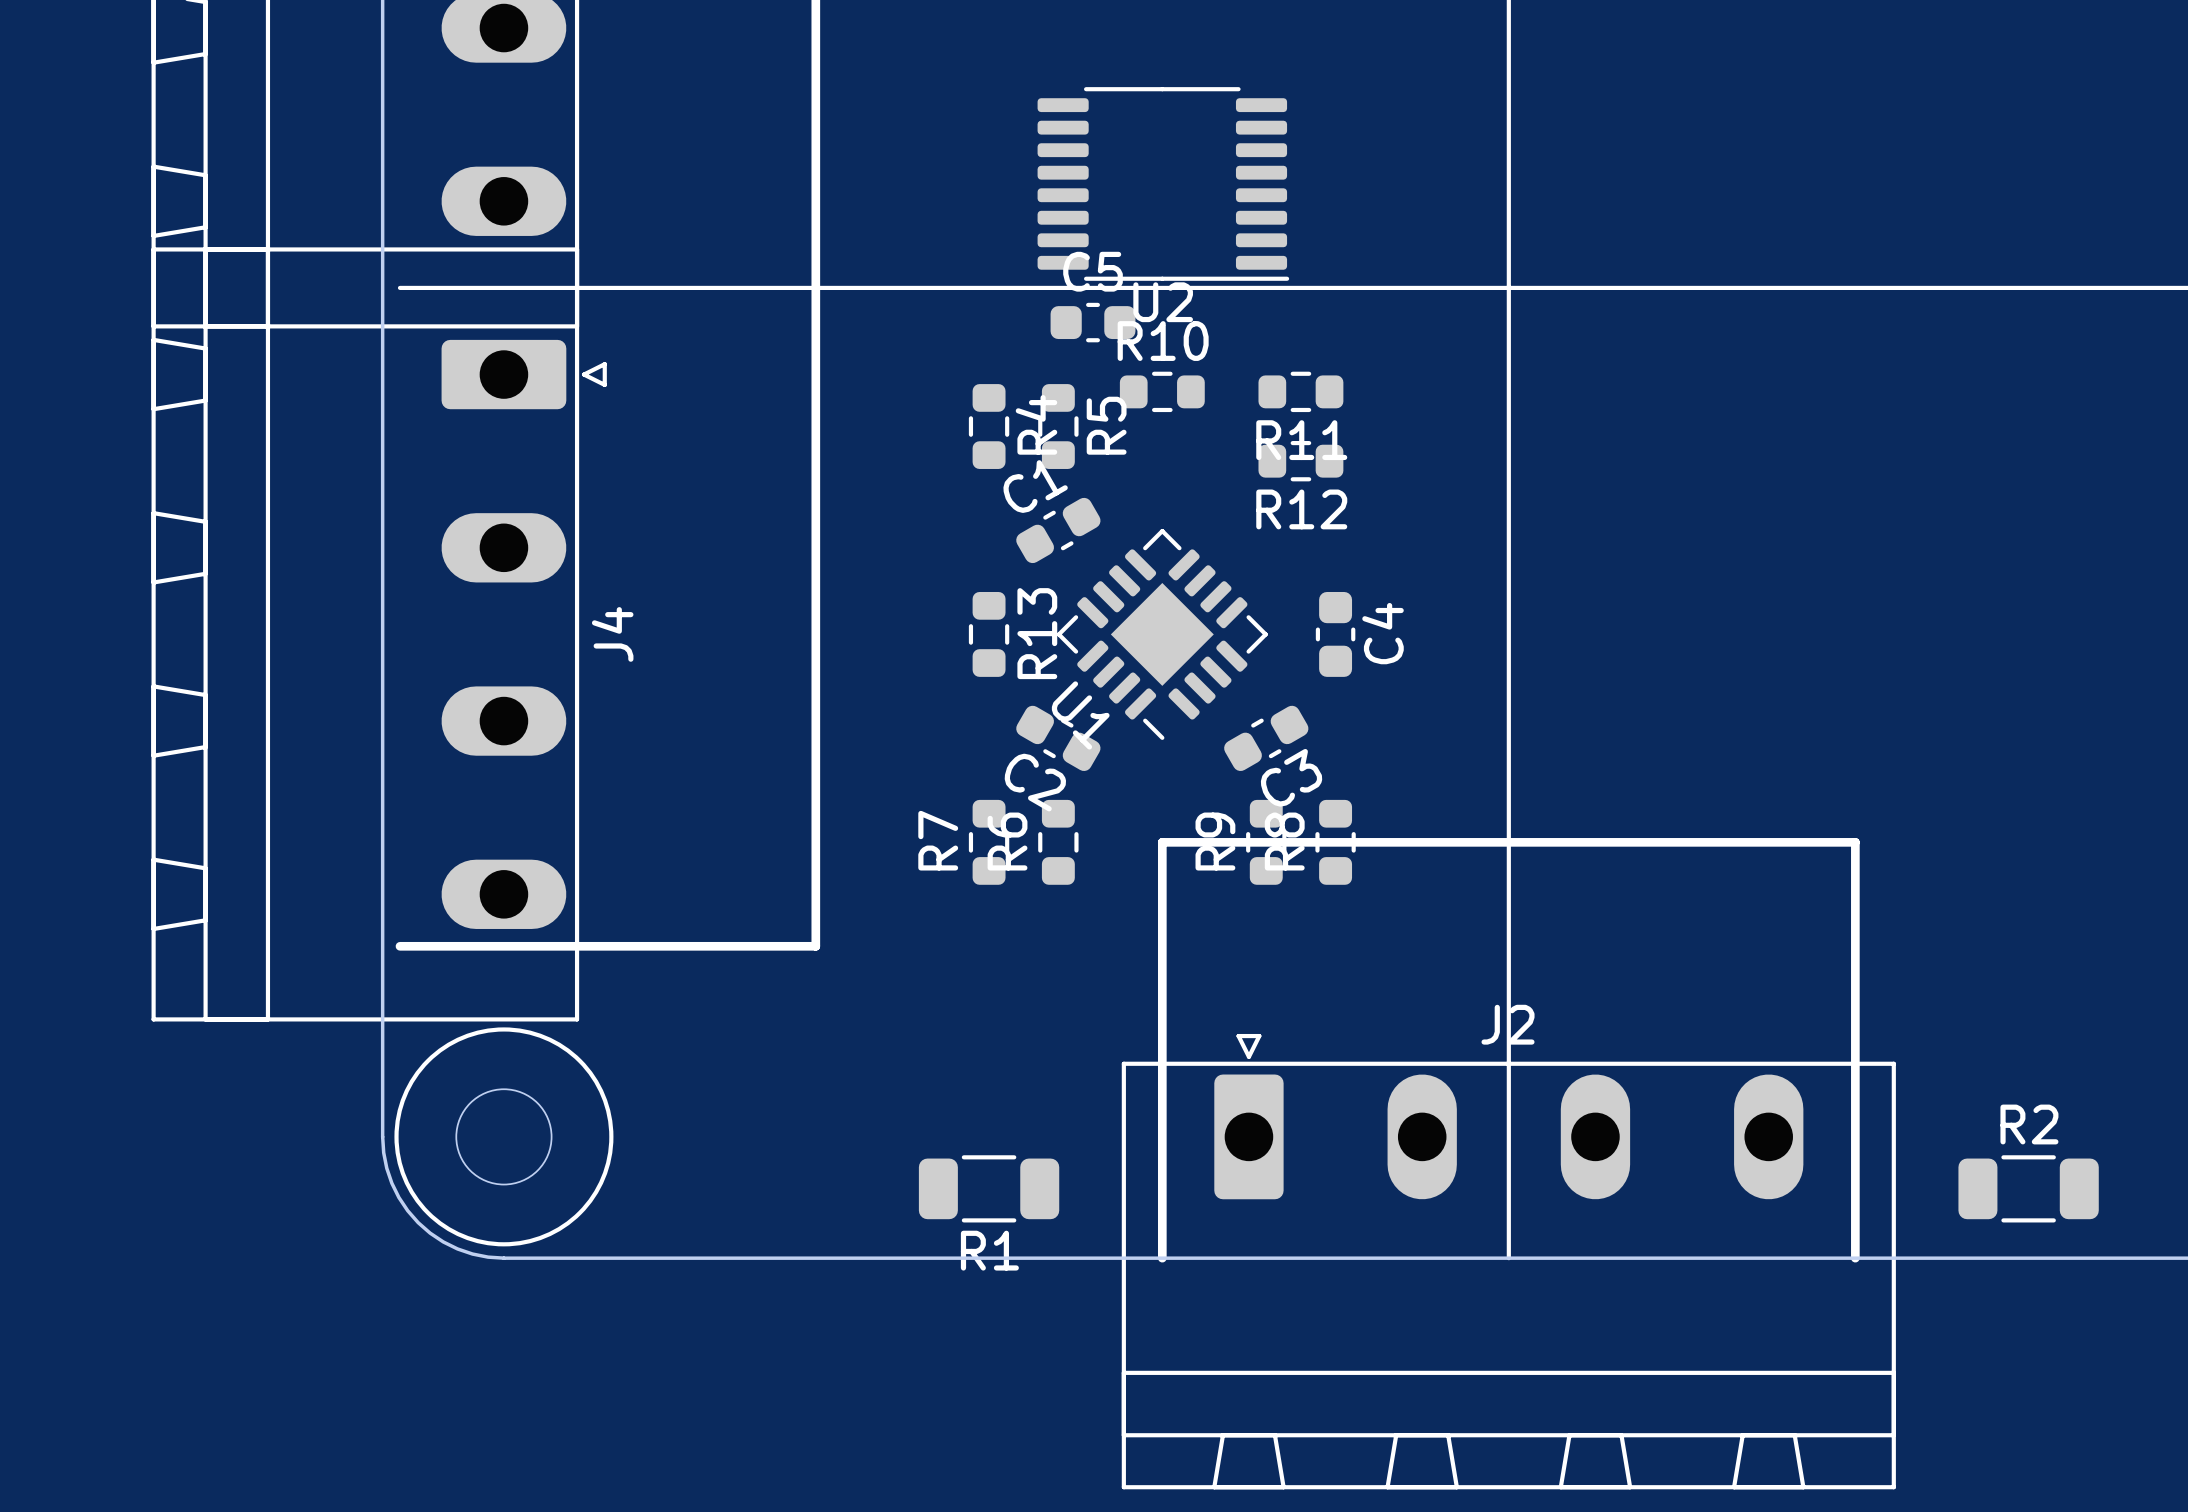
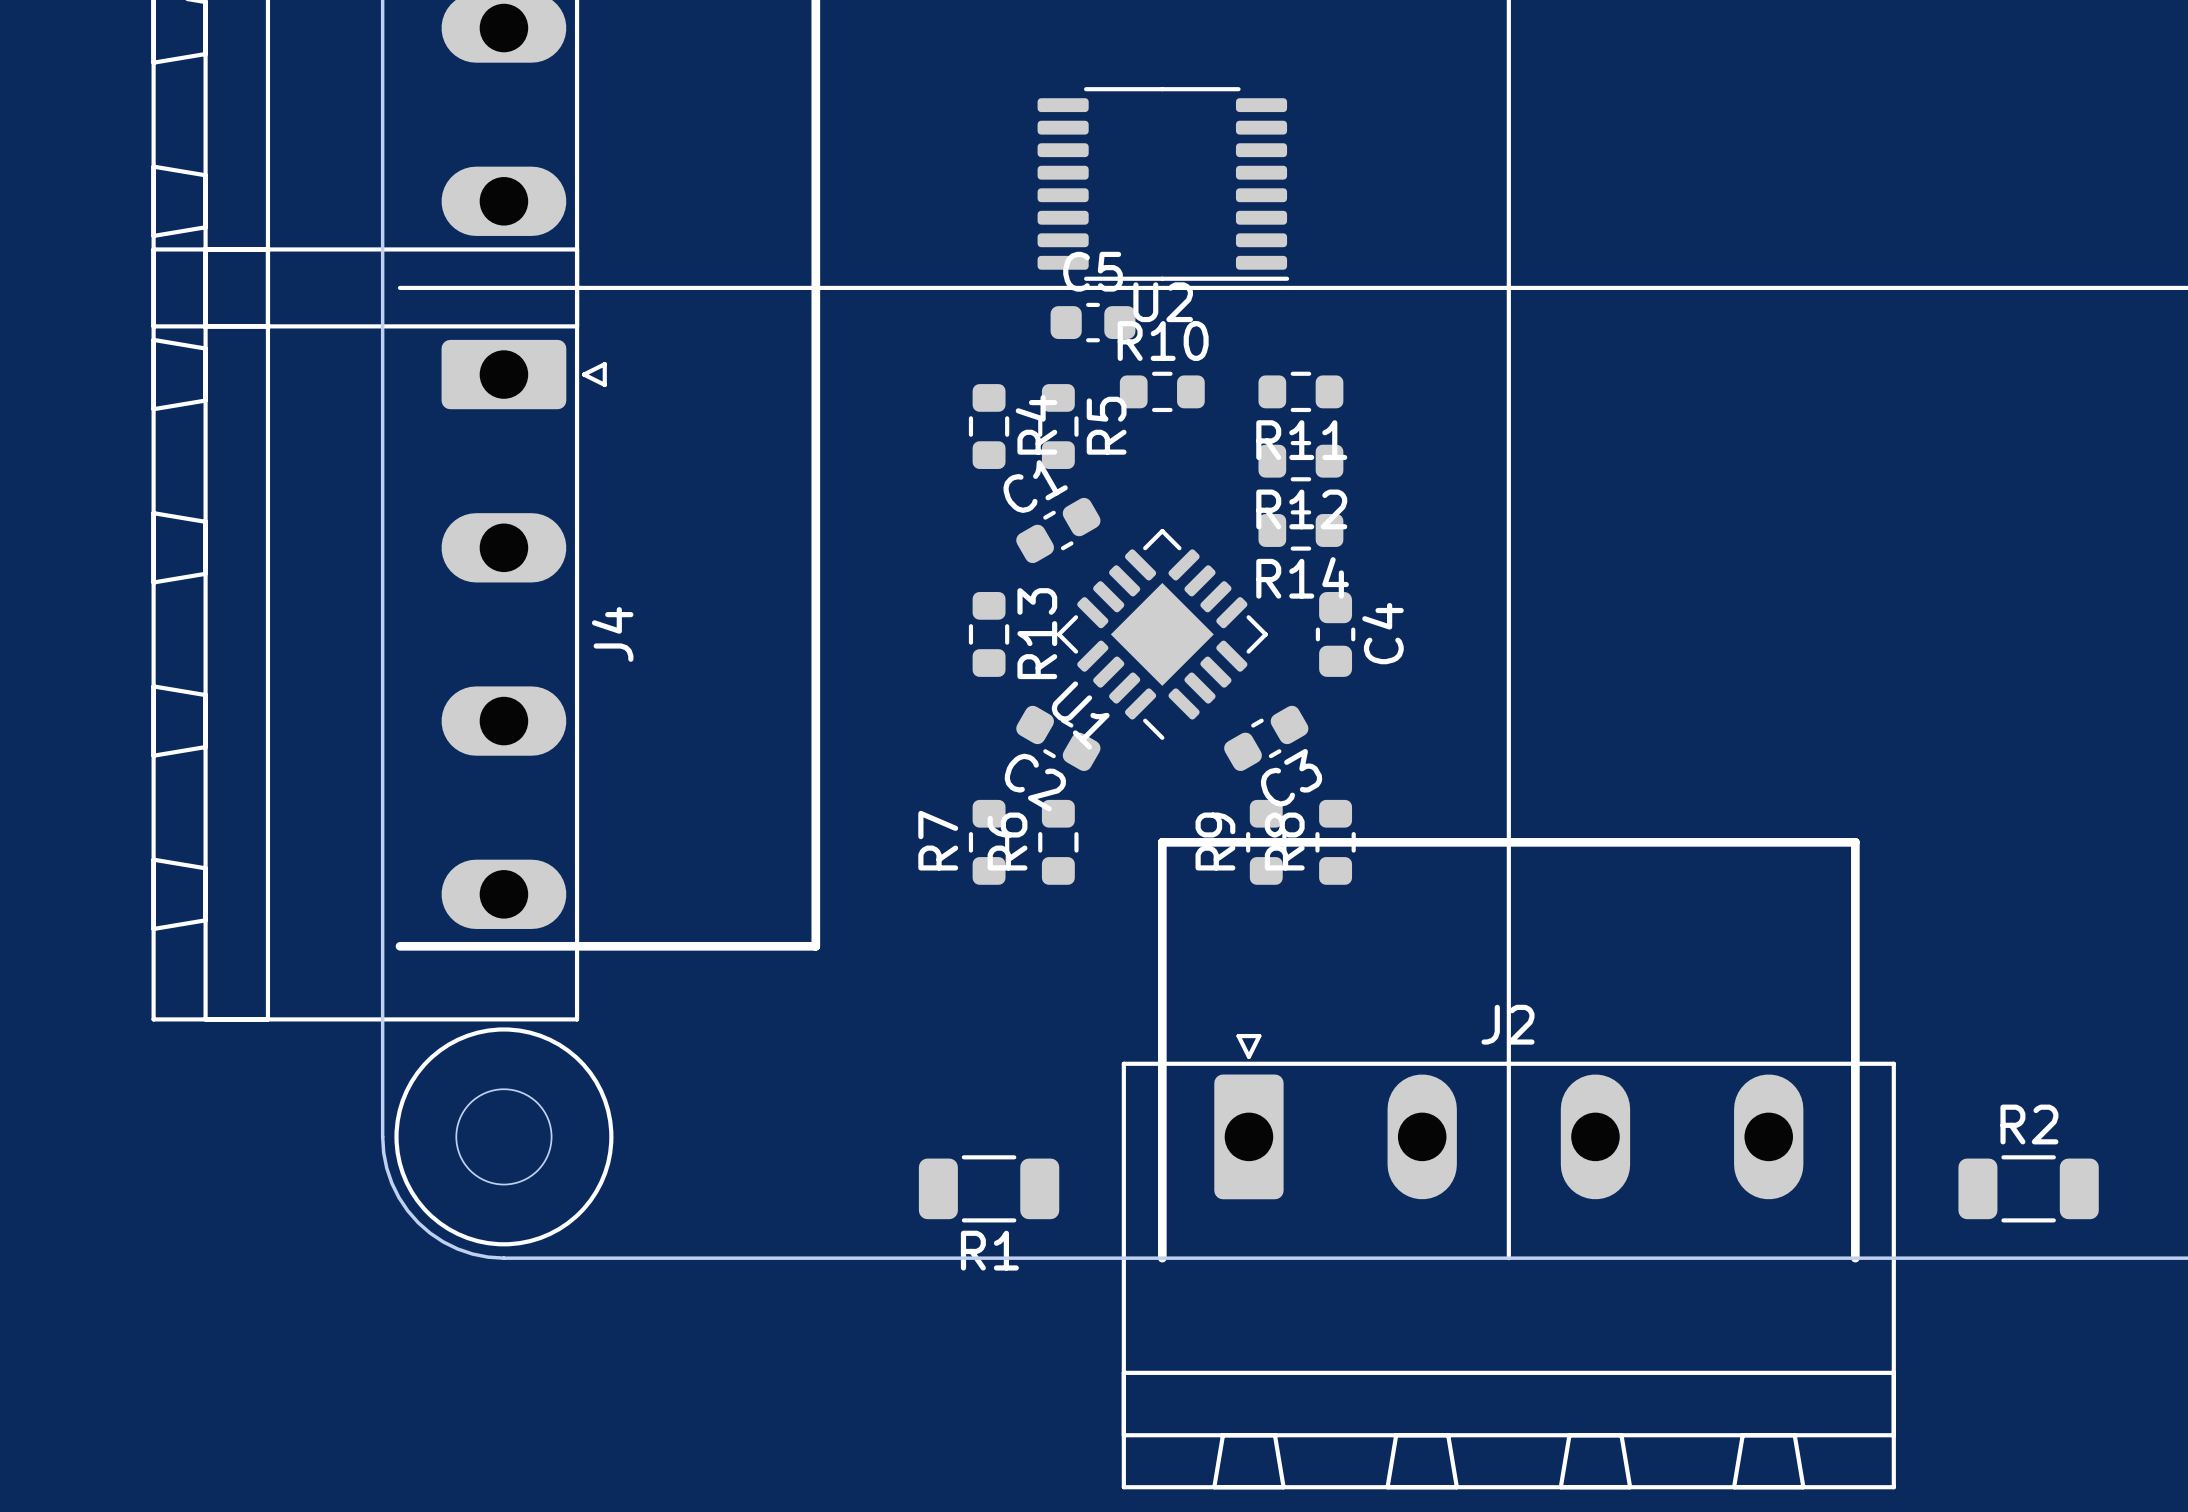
R14: none -> (1300, 530)

